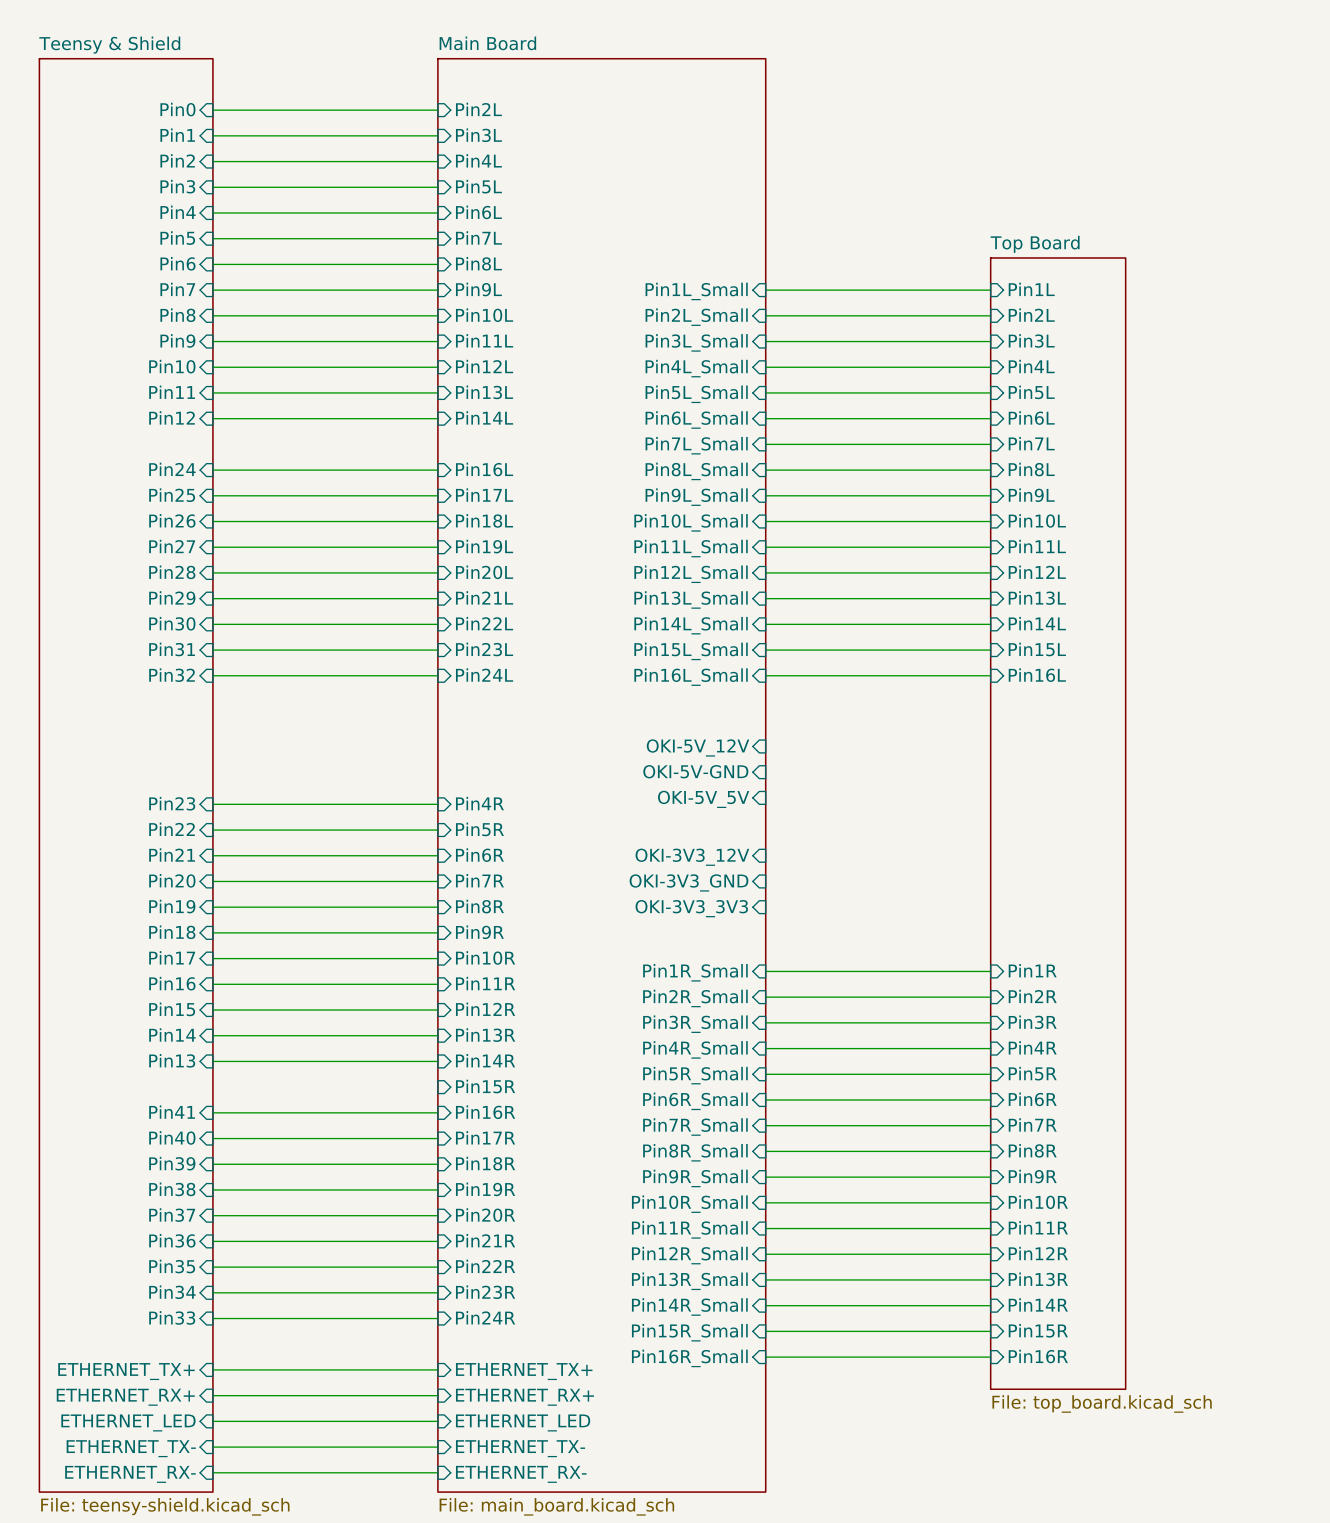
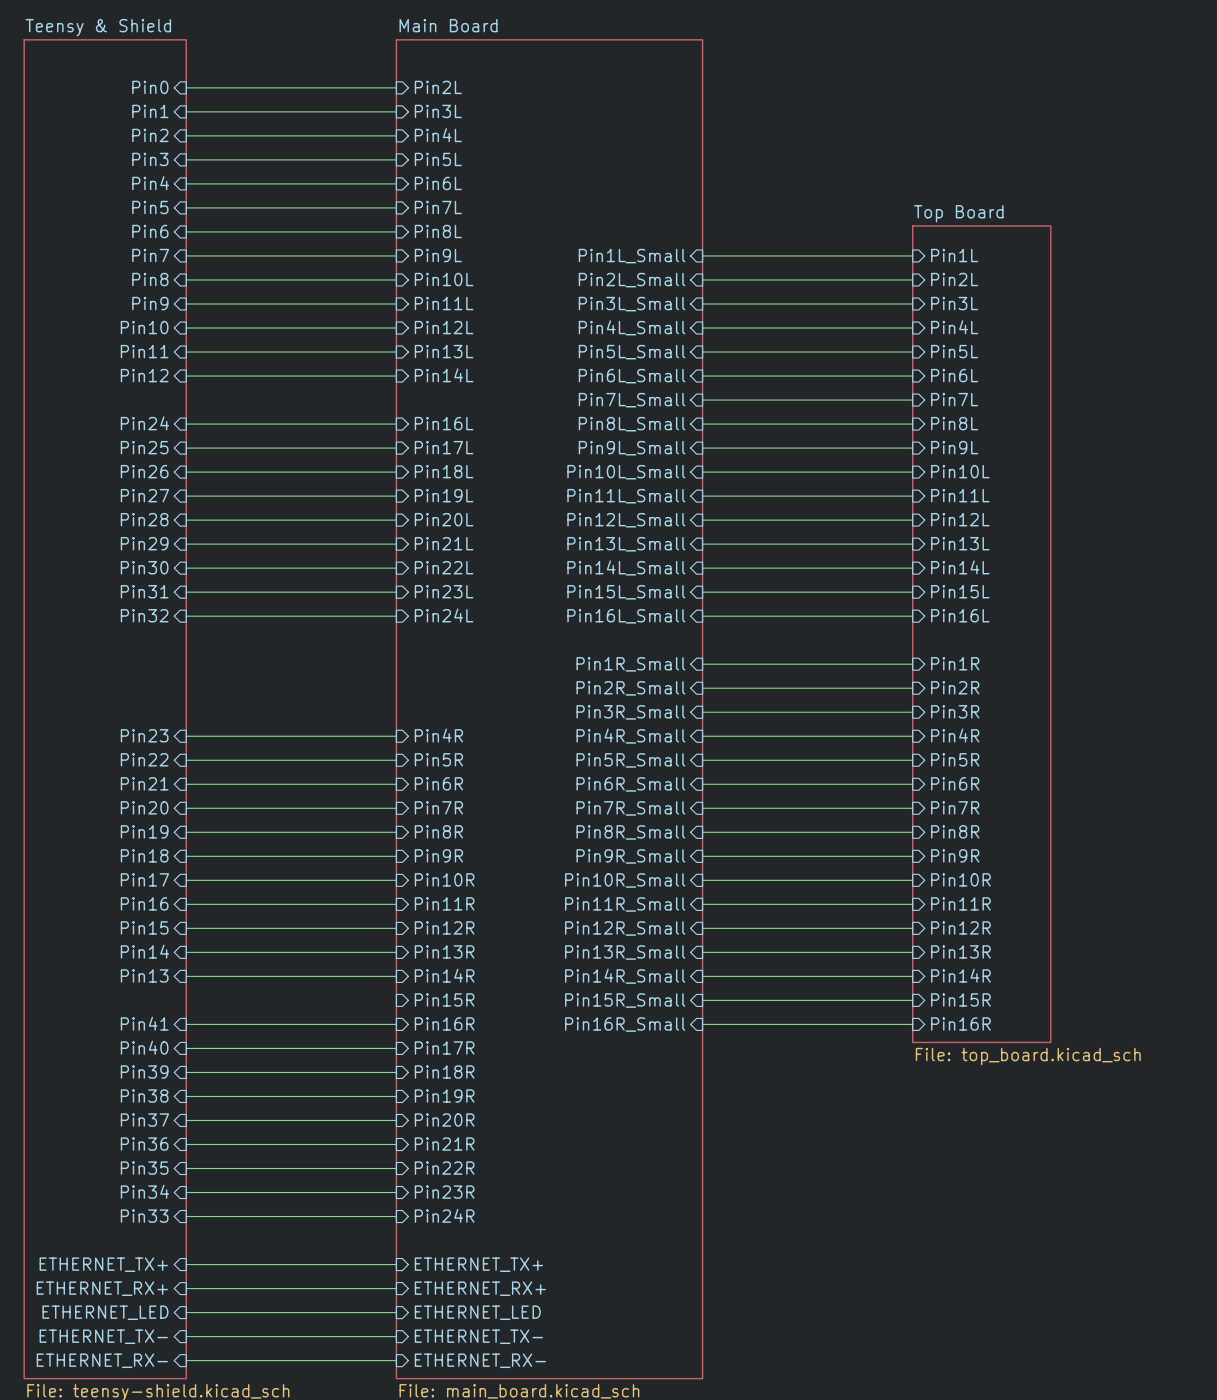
sheet Top Board: none -> File: top_board.kicad_sch (981, 634)
sheet pin: OKI-5V_12V (698, 747) -> none
sheet pin: OKI-5V-GND (695, 771) -> none
sheet pin: OKI-5V_5V (703, 799) -> none
sheet Top Board: File: top_board.kicad_sch (1058, 823) -> none
sheet pin: OKI-3V3_12V (692, 857) -> Pin6R_Small (630, 784)
sheet pin: OKI-3V3_GND (688, 882) -> Pin7R_Small (630, 808)
sheet pin: OKI-3V3_3V3 (691, 908) -> Pin8R_Small (630, 832)
sheet pin position: Pin1R (1032, 970) -> Pin1R (955, 663)
wire: (765, 971) (990, 971) -> (702, 664) (912, 664)
sheet pin position: Pin1R_Small (695, 972) -> Pin1R_Small (630, 664)
sheet pin position: Pin2R (1032, 996) -> Pin2R (955, 687)
wire: (765, 997) (990, 997) -> (702, 688) (912, 688)
sheet pin position: Pin2R_Small (695, 998) -> Pin2R_Small (630, 688)
wire: (765, 1022) (990, 1022) -> (702, 712) (912, 712)
sheet pin position: Pin3R (1032, 1022) -> Pin3R (955, 711)
sheet pin position: Pin3R_Small (695, 1024) -> Pin3R_Small (630, 712)
sheet pin position: Pin4R (1032, 1047) -> Pin4R (955, 735)
wire: (765, 1048) (990, 1048) -> (702, 736) (912, 736)
sheet pin position: Pin4R_Small (695, 1049) -> Pin4R_Small (630, 736)
sheet pin position: Pin5R (1032, 1073) -> Pin5R (955, 759)
wire: (765, 1074) (990, 1074) -> (702, 760) (912, 760)
sheet pin position: Pin5R_Small (695, 1075) -> Pin5R_Small (630, 760)
wire: (765, 1099) (990, 1099) -> (702, 784) (912, 784)
sheet pin position: Pin6R (1032, 1099) -> Pin6R (955, 783)
sheet pin: Pin6R_Small (695, 1101) -> none
sheet pin position: Pin7R (1032, 1124) -> Pin7R (955, 807)
wire: (765, 1125) (990, 1125) -> (702, 808) (912, 808)
sheet pin: Pin7R_Small (695, 1127) -> none
sheet pin position: Pin8R (1032, 1150) -> Pin8R (955, 831)
wire: (765, 1151) (990, 1151) -> (702, 832) (912, 832)
sheet pin: Pin8R_Small (695, 1152) -> none
sheet pin position: Pin9R (1032, 1176) -> Pin9R (955, 855)
wire: (765, 1177) (990, 1177) -> (702, 856) (912, 856)
sheet pin position: Pin9R_Small (695, 1178) -> Pin9R_Small (630, 856)
wire: (765, 1202) (990, 1202) -> (702, 880) (912, 880)
sheet pin position: Pin10R (1038, 1202) -> Pin10R (960, 879)
sheet pin position: Pin10R_Small (689, 1204) -> Pin10R_Small (625, 880)
sheet pin position: Pin11R (1038, 1227) -> Pin11R (960, 903)
wire: (765, 1228) (990, 1228) -> (702, 904) (912, 904)
sheet pin position: Pin11R_Small (689, 1229) -> Pin11R_Small (625, 904)
sheet pin position: Pin12R (1038, 1253) -> Pin12R (960, 927)
wire: (765, 1254) (990, 1254) -> (702, 928) (912, 928)
sheet pin position: Pin12R_Small (689, 1255) -> Pin12R_Small (625, 928)
wire: (765, 1279) (990, 1279) -> (702, 952) (912, 952)
sheet pin position: Pin13R (1038, 1279) -> Pin13R (960, 951)
sheet pin position: Pin13R_Small (689, 1281) -> Pin13R_Small (625, 952)
sheet pin position: Pin14R (1038, 1304) -> Pin14R (960, 975)
wire: (765, 1305) (990, 1305) -> (702, 976) (912, 976)
sheet pin position: Pin14R_Small (689, 1307) -> Pin14R_Small (625, 976)
sheet pin position: Pin15R (1038, 1330) -> Pin15R (960, 999)
wire: (765, 1331) (990, 1331) -> (702, 1000) (912, 1000)
sheet pin position: Pin15R_Small (689, 1332) -> Pin15R_Small (625, 1000)
sheet pin position: Pin16R (1038, 1356) -> Pin16R (960, 1023)
wire: (765, 1357) (990, 1357) -> (702, 1024) (912, 1024)
sheet pin position: Pin16R_Small (689, 1358) -> Pin16R_Small (625, 1024)

